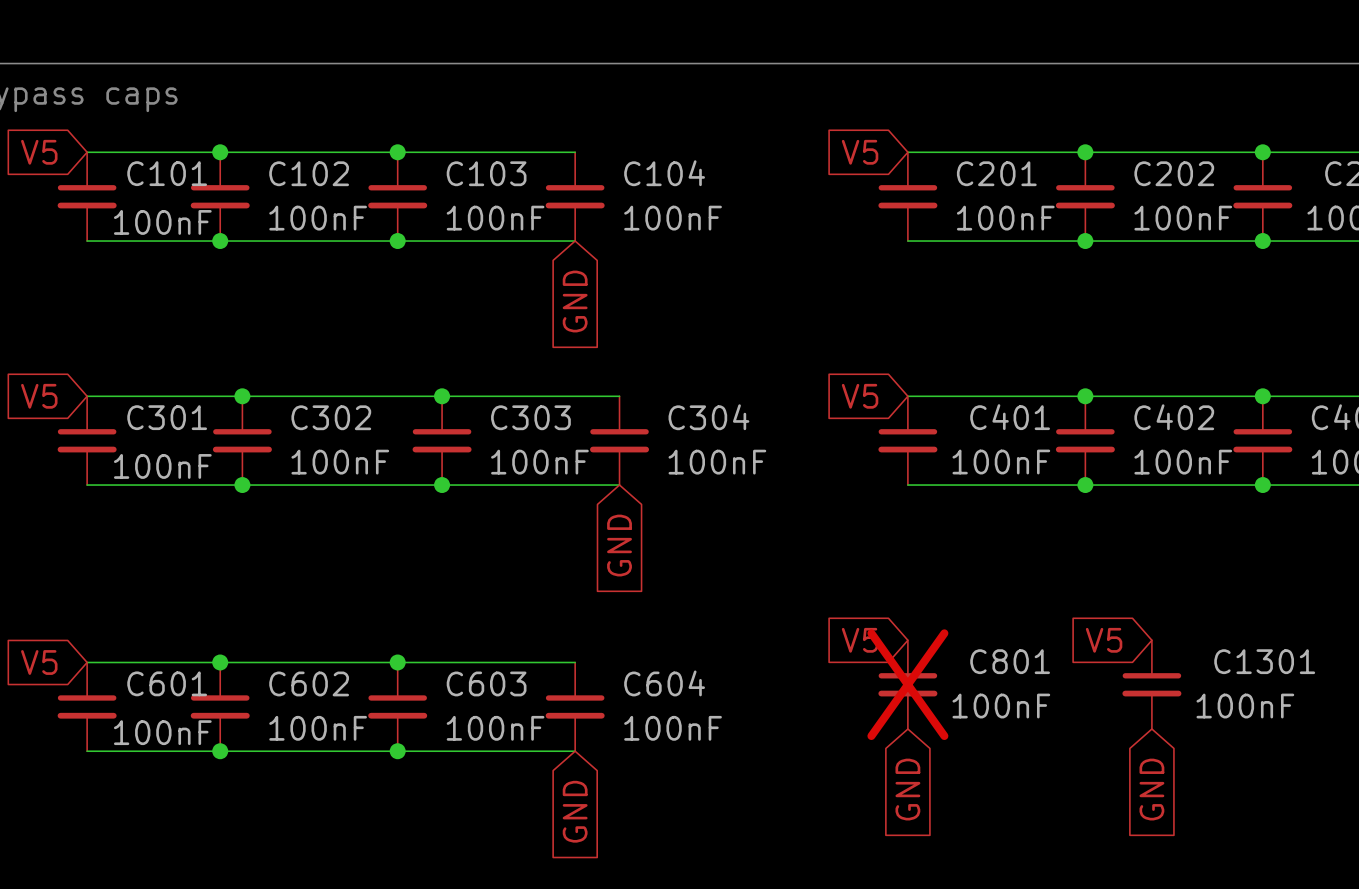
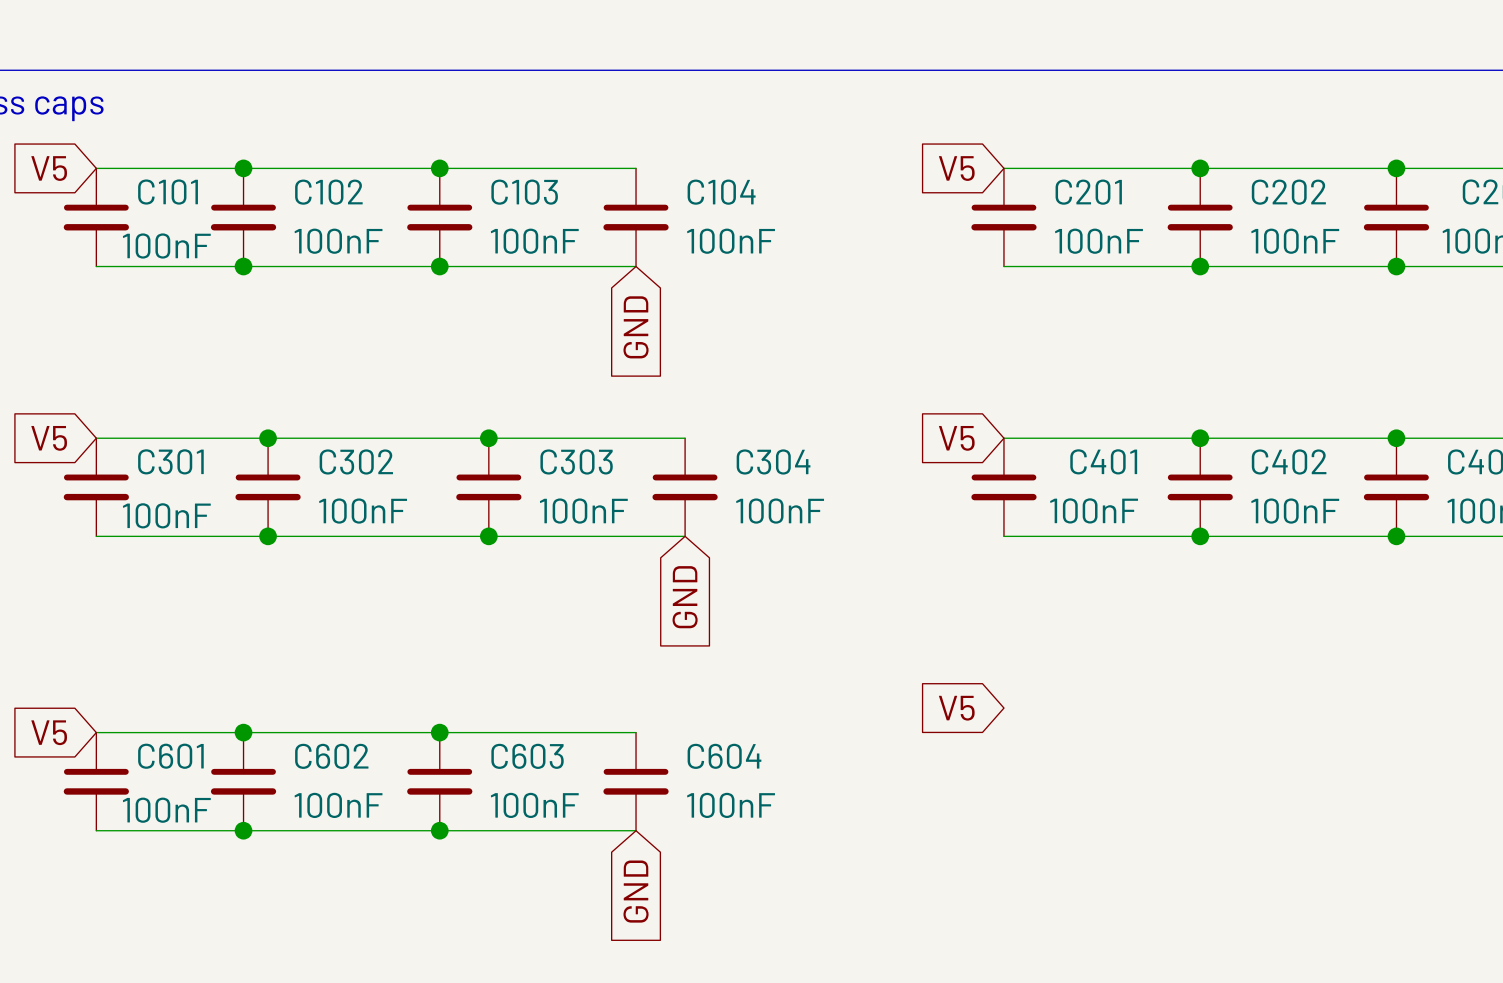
global label: V5 (1104, 640) -> none
C801: 100nF (907, 684) -> none
C1301: 100nF (1151, 684) -> none
global label: GND (907, 789) -> none
global label: GND (1151, 789) -> none

